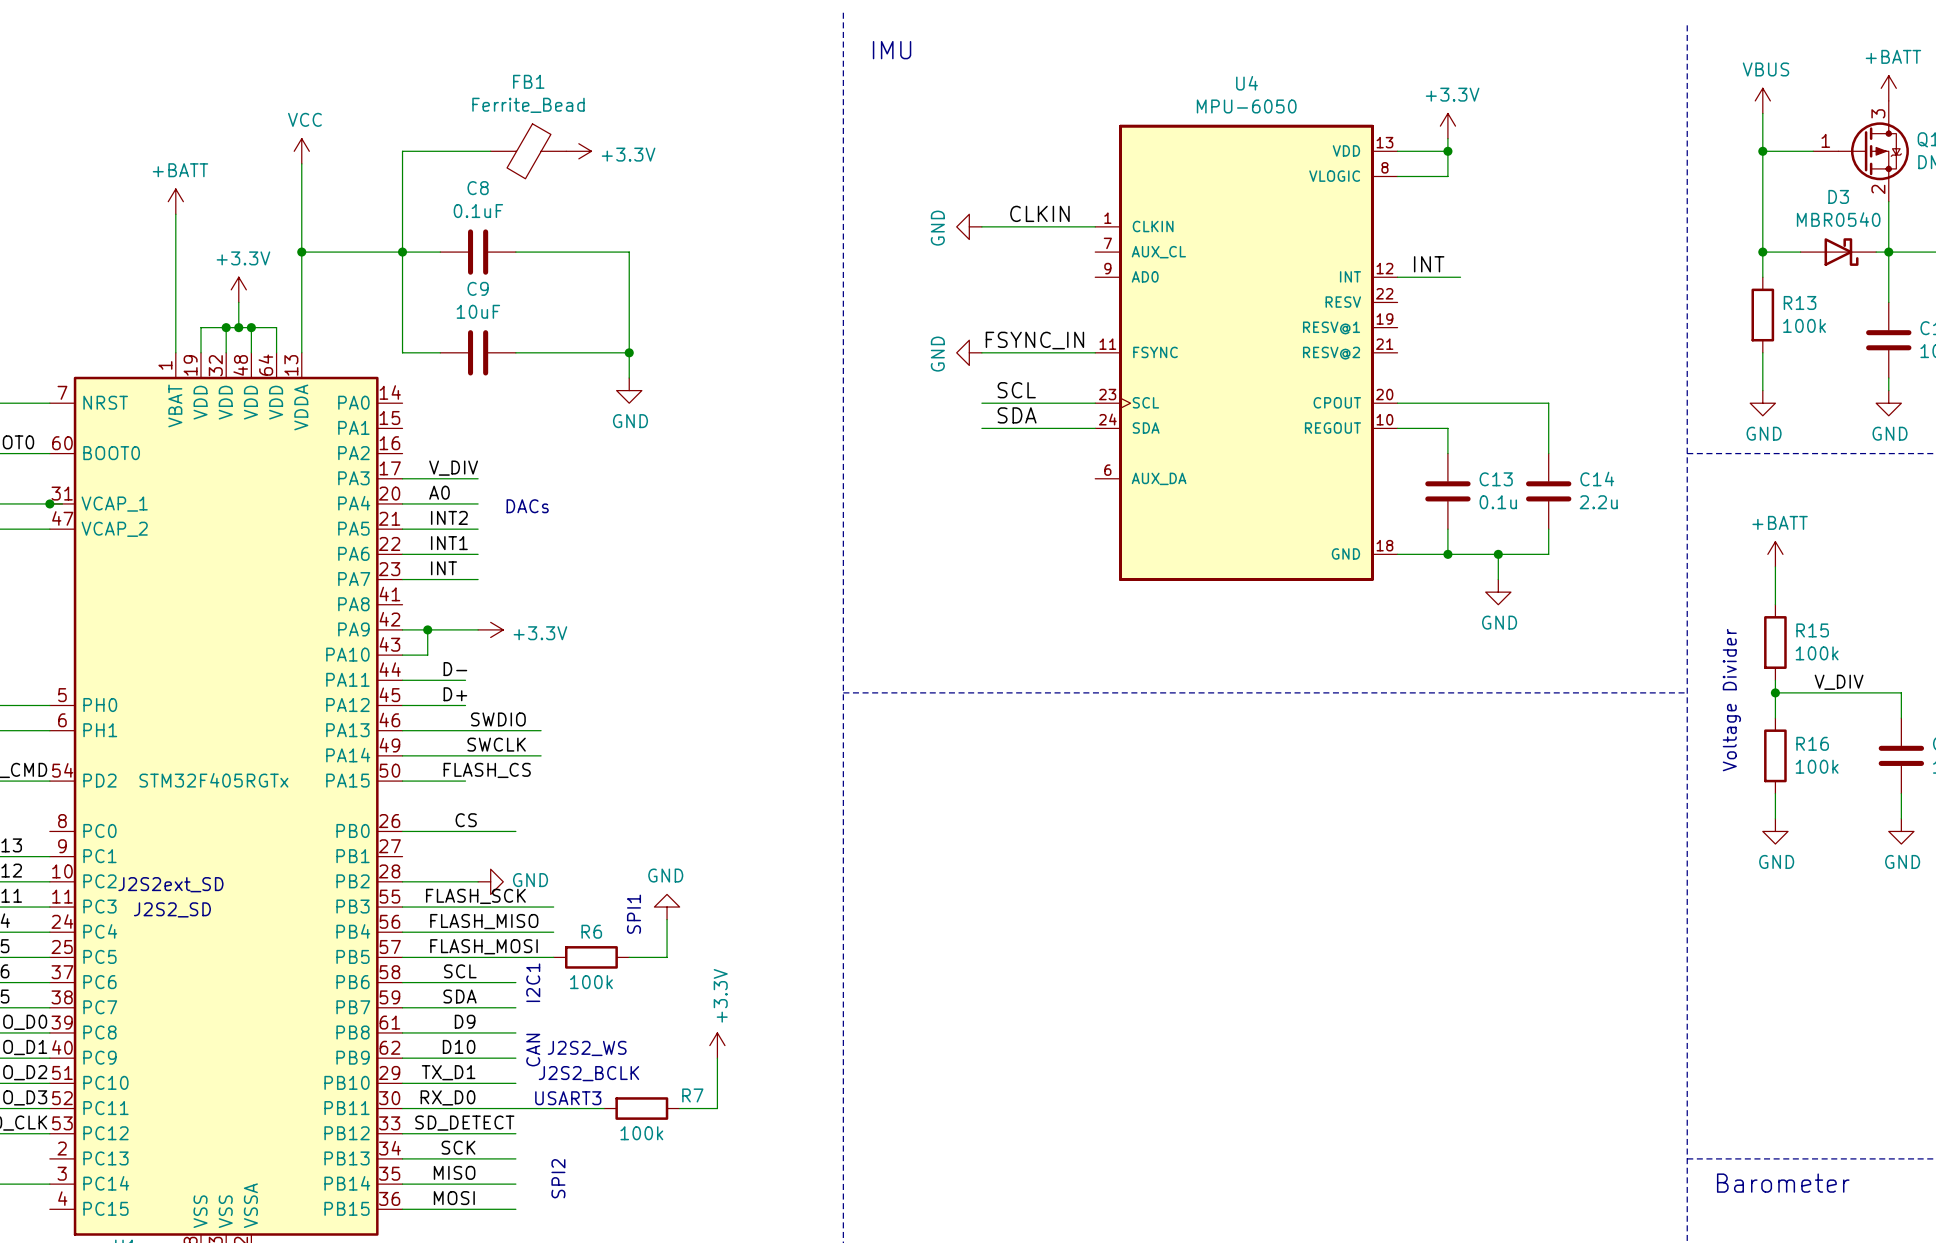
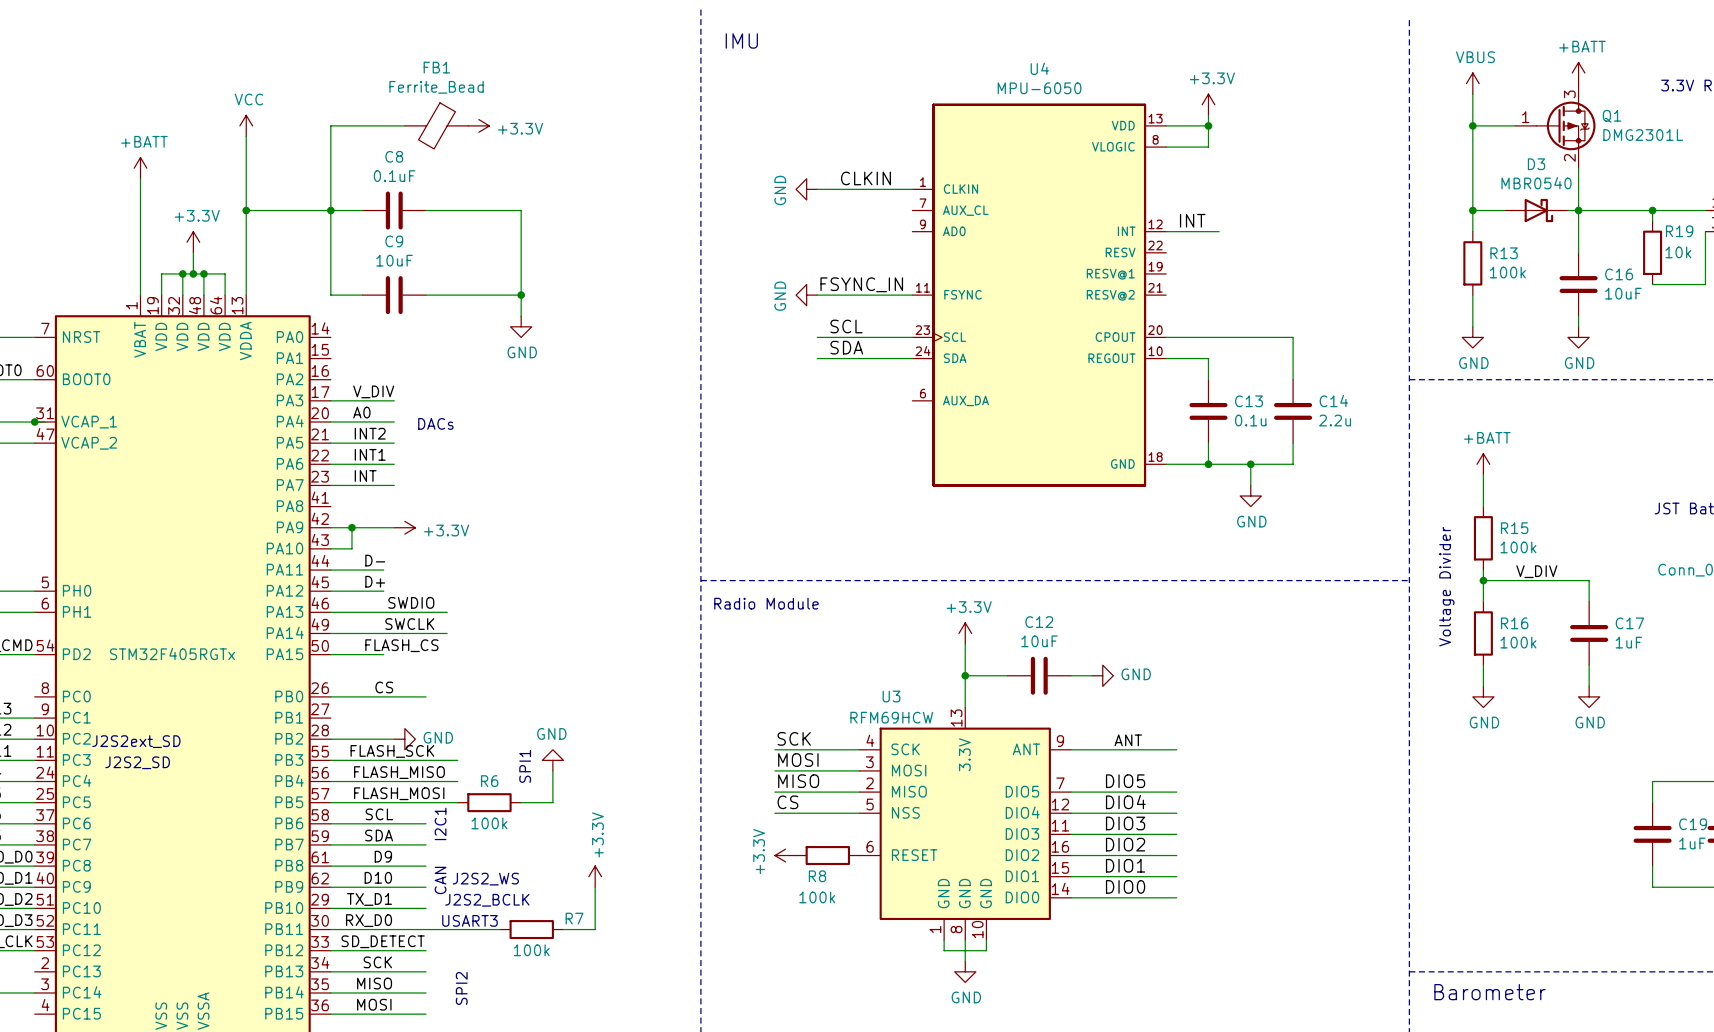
text: none -> Radio Module (766, 603)
power symbol: none -> +3.3V (965, 633)
wire: none -> (965, 644) (965, 707)
wire: none -> (965, 675) (1007, 675)
junction: none -> (965, 675)
C12: none -> 10uF (1039, 675)
wire: none -> (1071, 675) (1092, 675)
power symbol: none -> GND (1102, 675)
label: none -> SCK (794, 738)
label: none -> ANT (1128, 740)
wire: none -> (774, 749) (859, 749)
wire: none -> (1071, 749) (1176, 749)
label: none -> MOSI (798, 760)
wire: none -> (774, 770) (859, 770)
label: none -> MISO (798, 781)
label: none -> DIO5 (1125, 781)
wire: none -> (774, 792) (859, 792)
wire: none -> (1071, 792) (1176, 792)
label: none -> DIO4 (1125, 802)
label: none -> CS (787, 802)
wire: none -> (774, 813) (859, 813)
wire: none -> (1071, 813) (1176, 813)
U3: none -> RFM69HCW (965, 823)
label: none -> DIO3 (1125, 823)
wire: none -> (1071, 834) (1176, 834)
label: none -> DIO2 (1125, 844)
power symbol: none -> +3.3V (785, 855)
R8: none -> 100k (827, 855)
wire: none -> (1071, 855) (1176, 855)
label: none -> DIO1 (1125, 865)
wire: none -> (1071, 876) (1176, 876)
label: none -> DIO0 (1125, 886)
wire: none -> (1071, 897) (1176, 897)
wire: none -> (944, 940) (944, 950) (986, 950) (986, 940)
wire: none -> (965, 940) (965, 961)
power symbol: none -> GND (965, 971)

